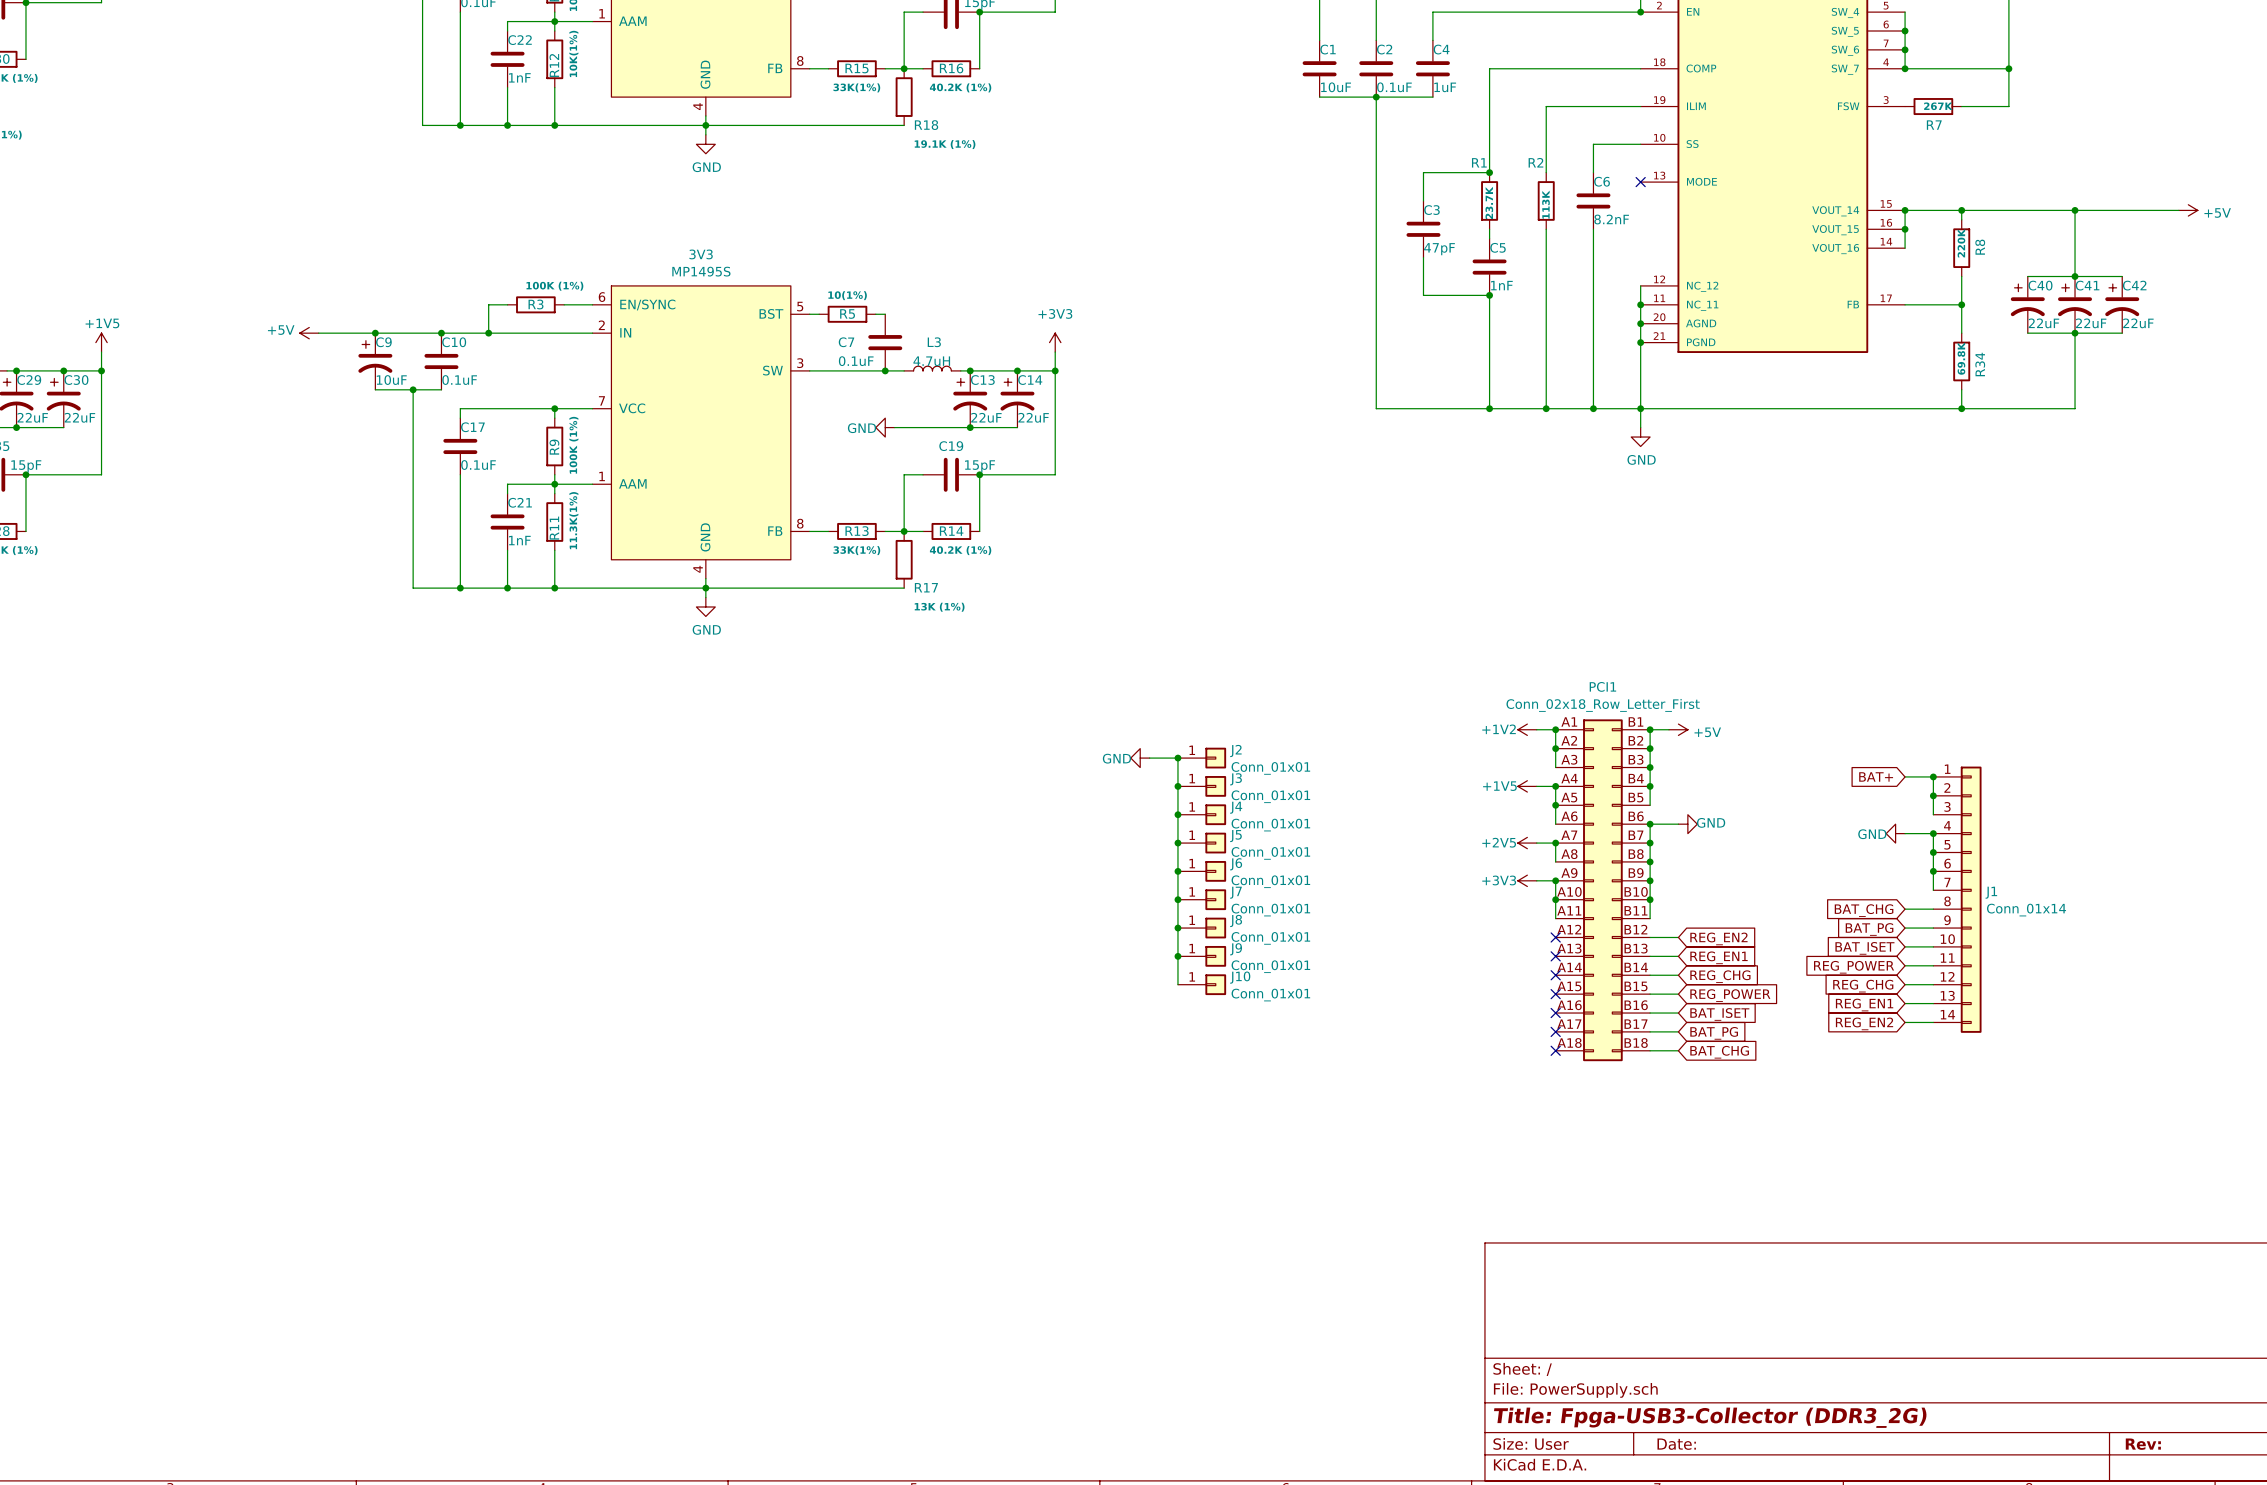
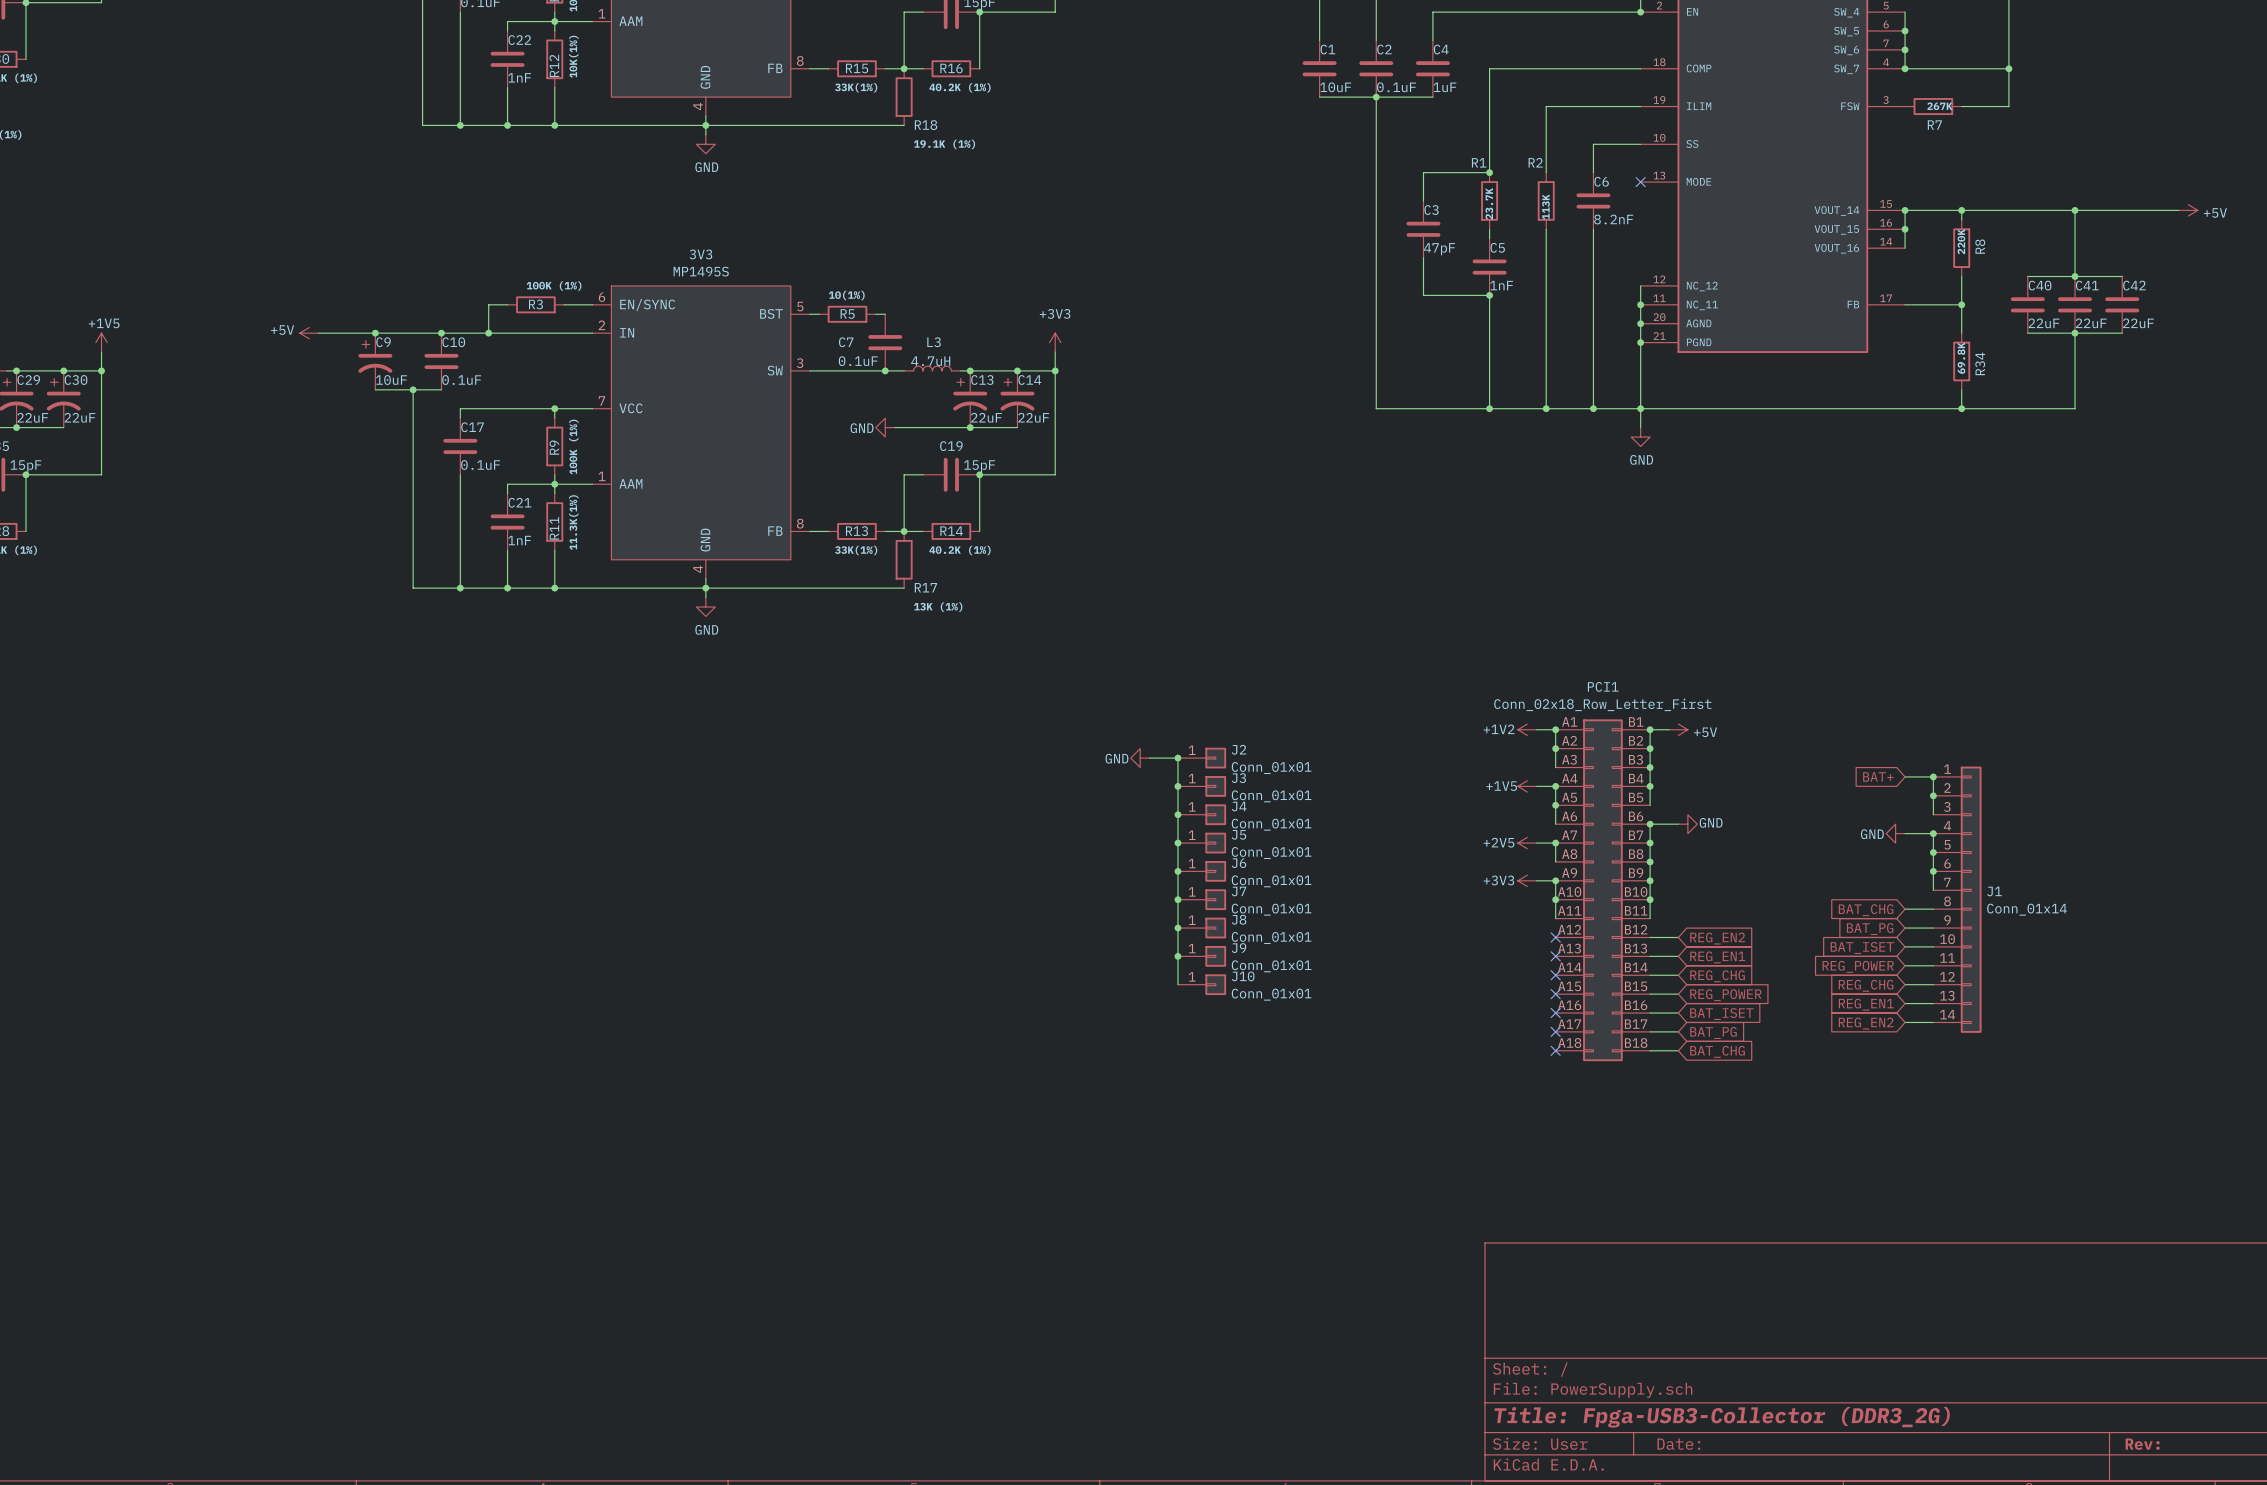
C40 symbol: [2010, 276, 2045, 334] -> [2010, 276, 2045, 334]
C41 symbol: [2058, 276, 2093, 334] -> [2058, 276, 2093, 334]
C42 symbol: [2105, 276, 2140, 334] -> [2105, 276, 2140, 334]

